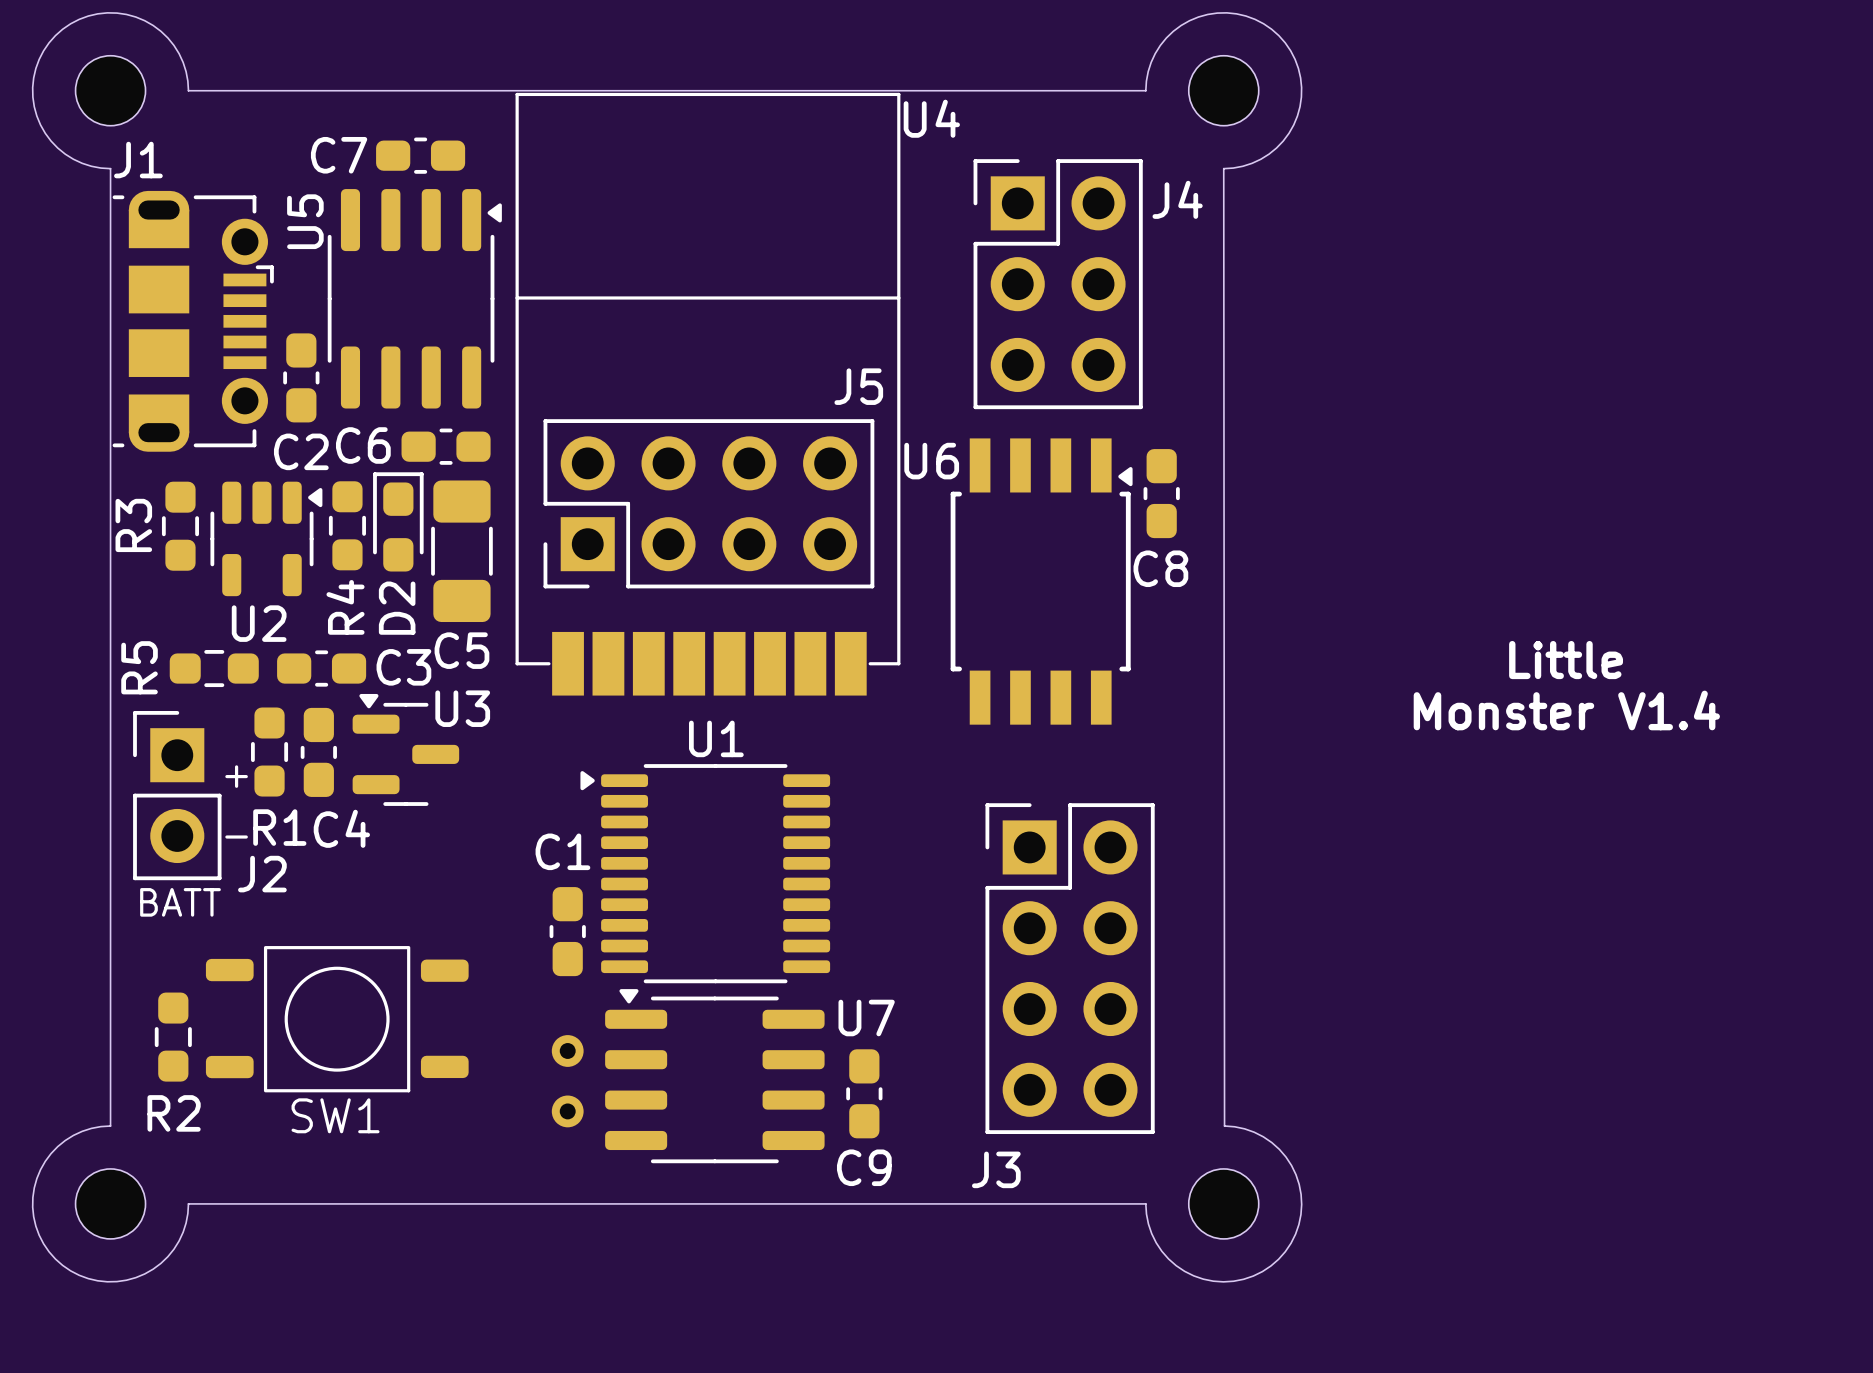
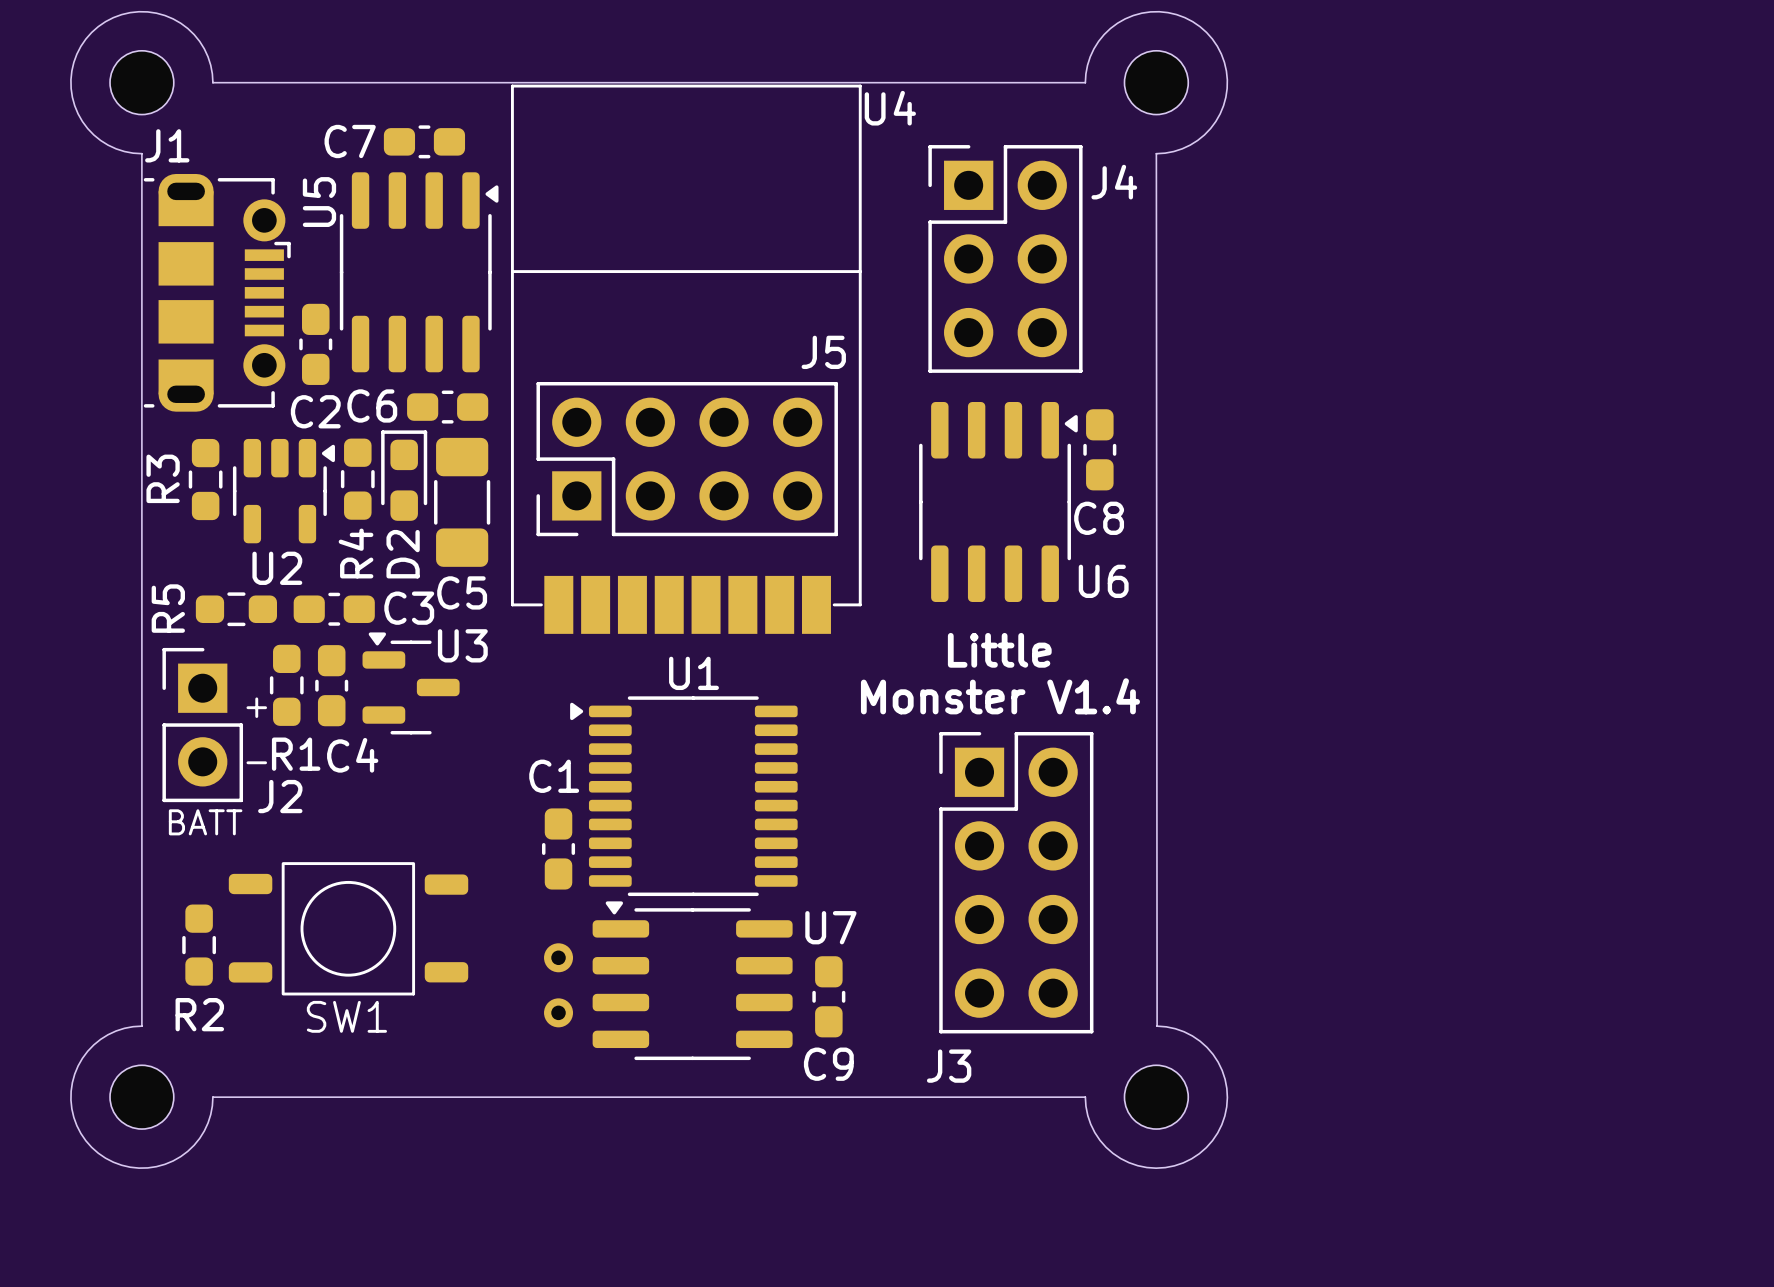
U6 footprint: [950, 438, 1133, 725] -> [919, 401, 1078, 602]
U6 name position: U6 (931, 461) -> U6 (1103, 581)
text position: Little (1566, 660) -> Little (999, 650)
text position: Monster V1.4 (1566, 710) -> Monster V1.4 (1000, 696)

